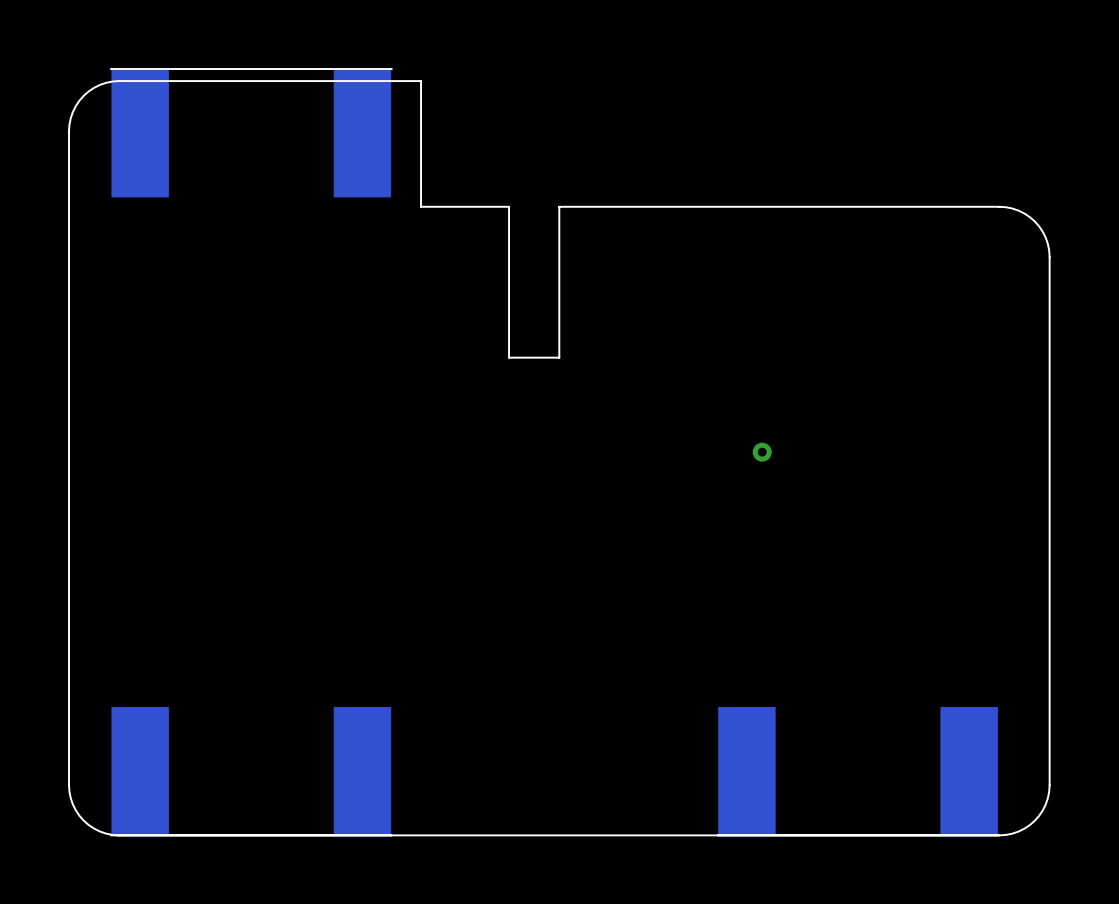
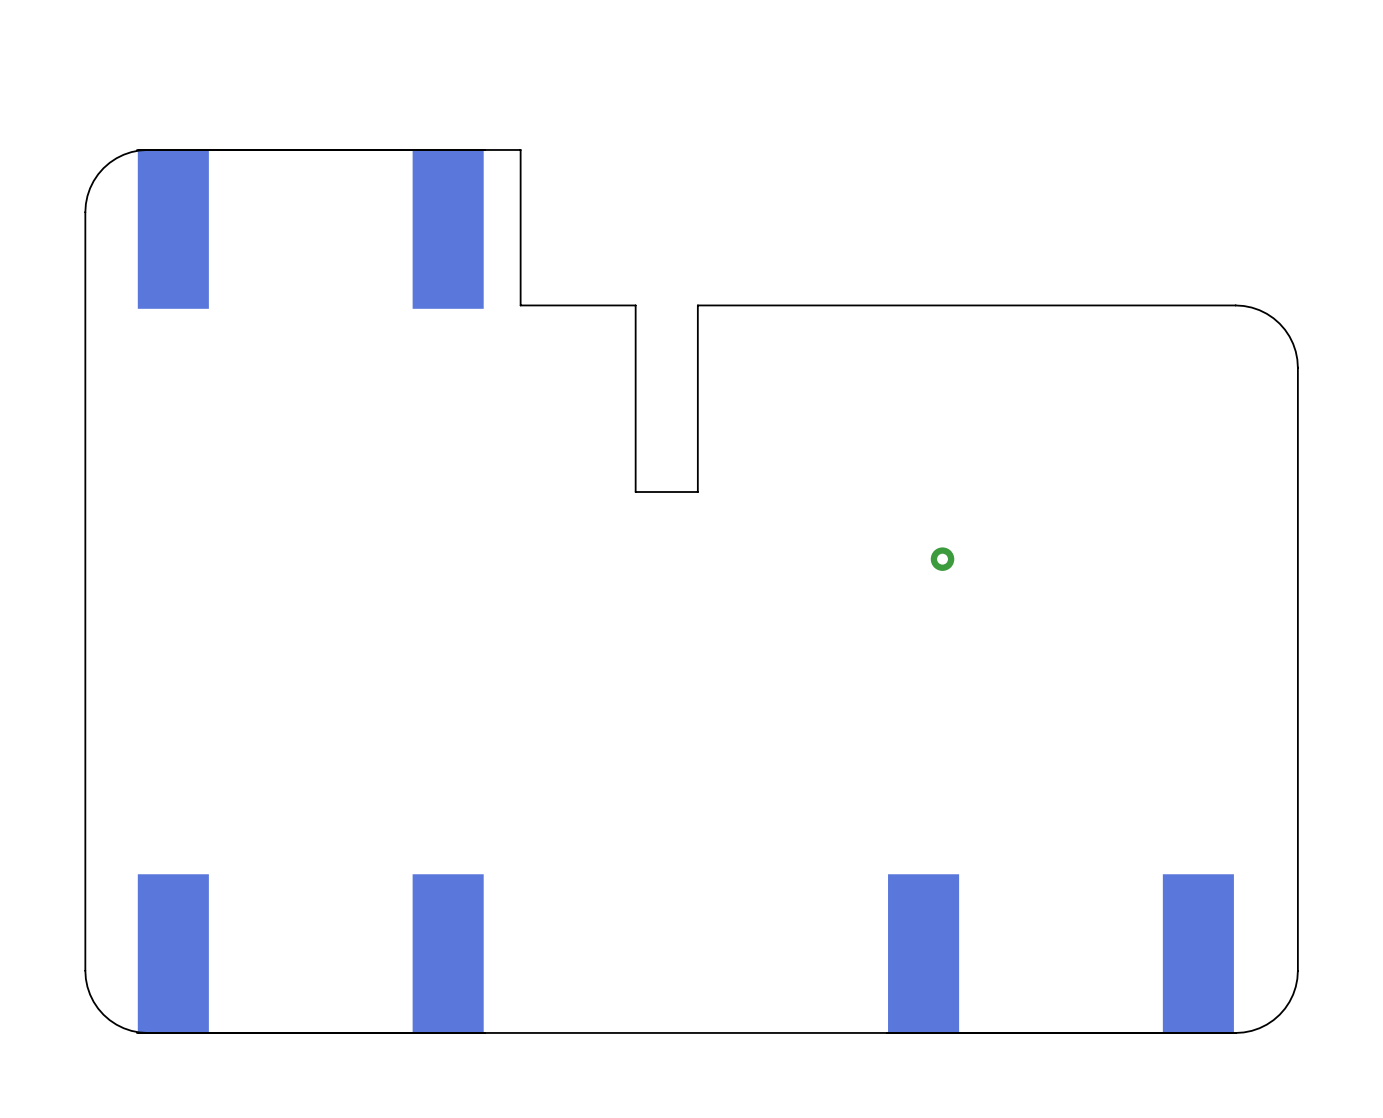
board edge: (421, 121) (421, 81) (112, 81) (100, 84) (88, 91) (79, 100) (72, 112) (69, 131) (69, 171) -> (520, 149) (139, 150) (116, 158) (103, 168) (90, 188) (85, 212)
part position: (251, 133) -> (310, 229)
board edge: (421, 206) (509, 206) (509, 357) (559, 357) (559, 206) (1005, 207) (1018, 210) (1029, 217) (1039, 226) (1045, 237) (1049, 257) (1049, 297) -> (520, 255) (520, 305) (635, 305) (635, 492) (697, 492) (697, 305) (1243, 305) (1266, 313) (1279, 323) (1293, 343) (1297, 367)

